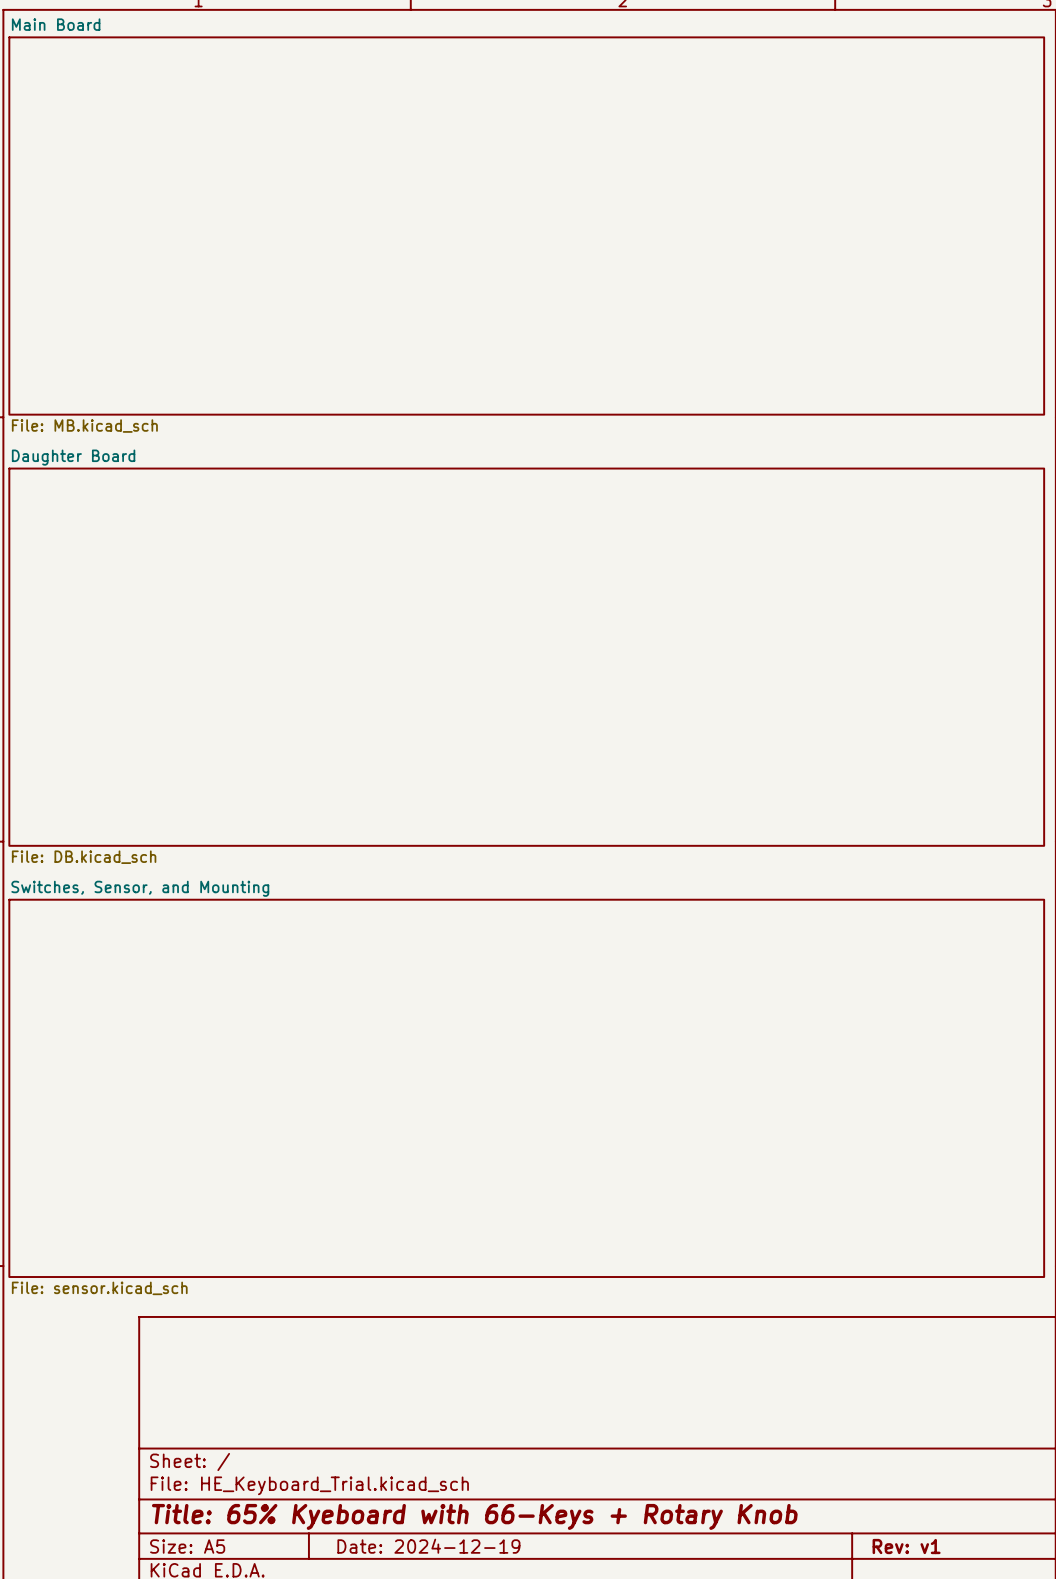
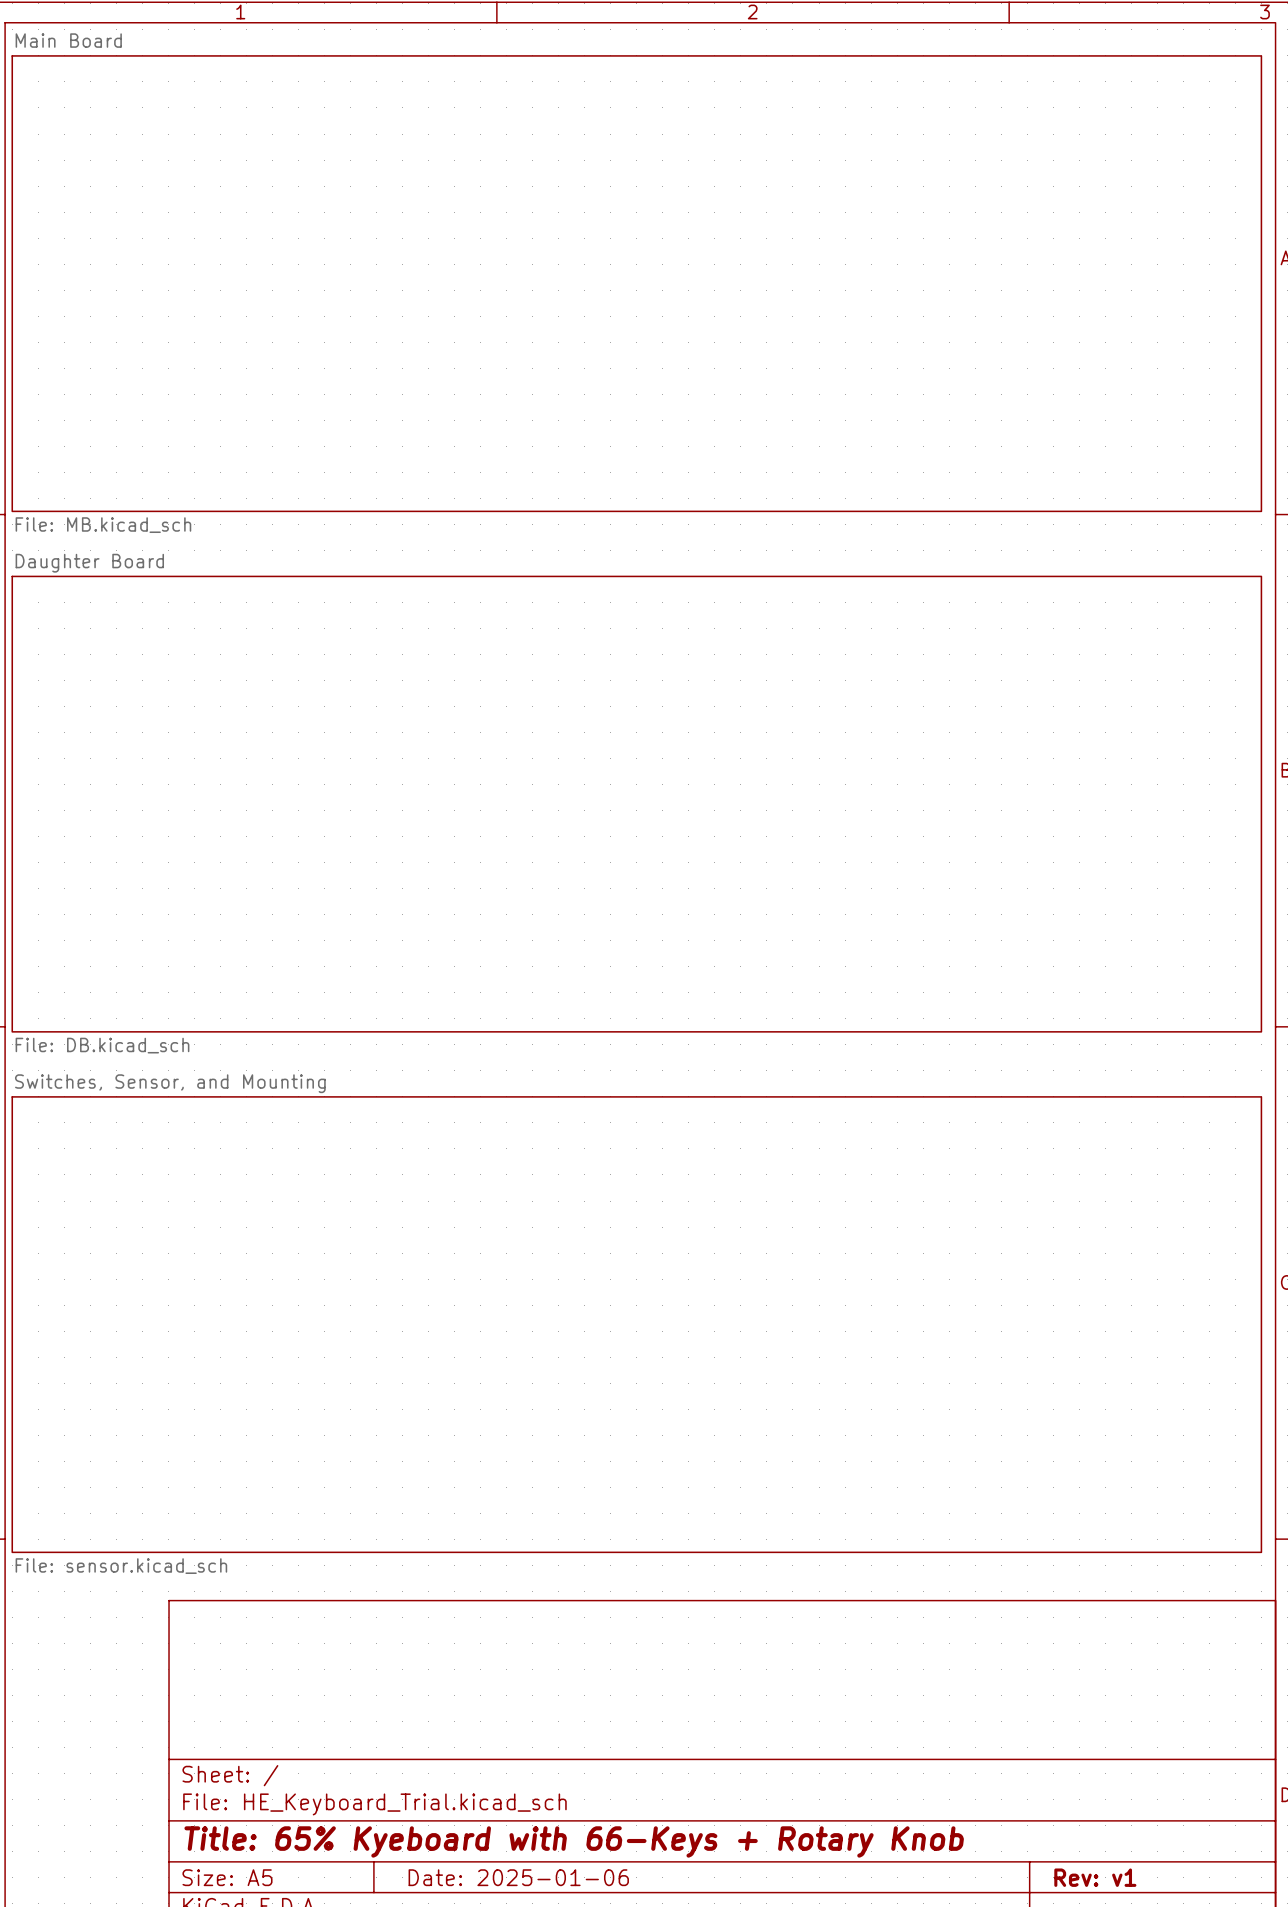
title block: Date: 2024-12-19 (428, 1546) -> Date: 2025-01-06 (518, 1877)

